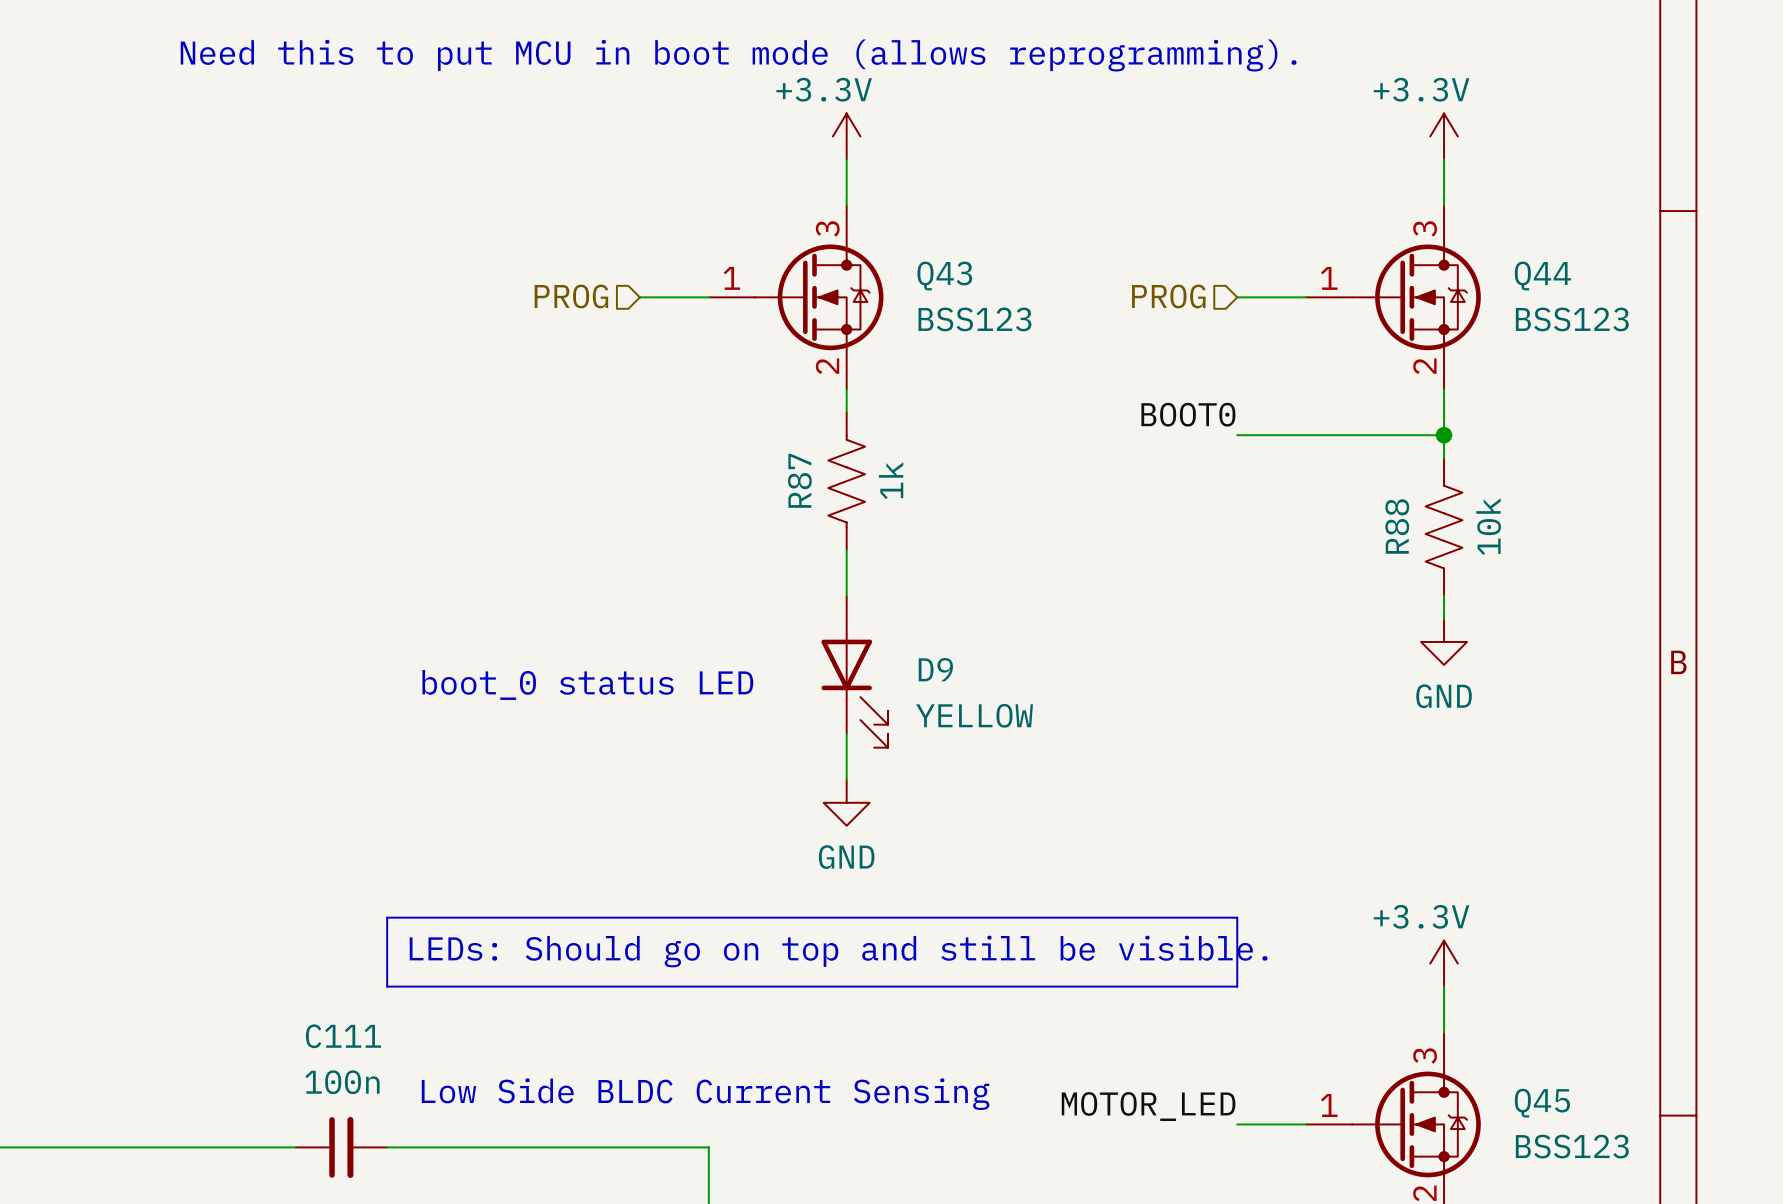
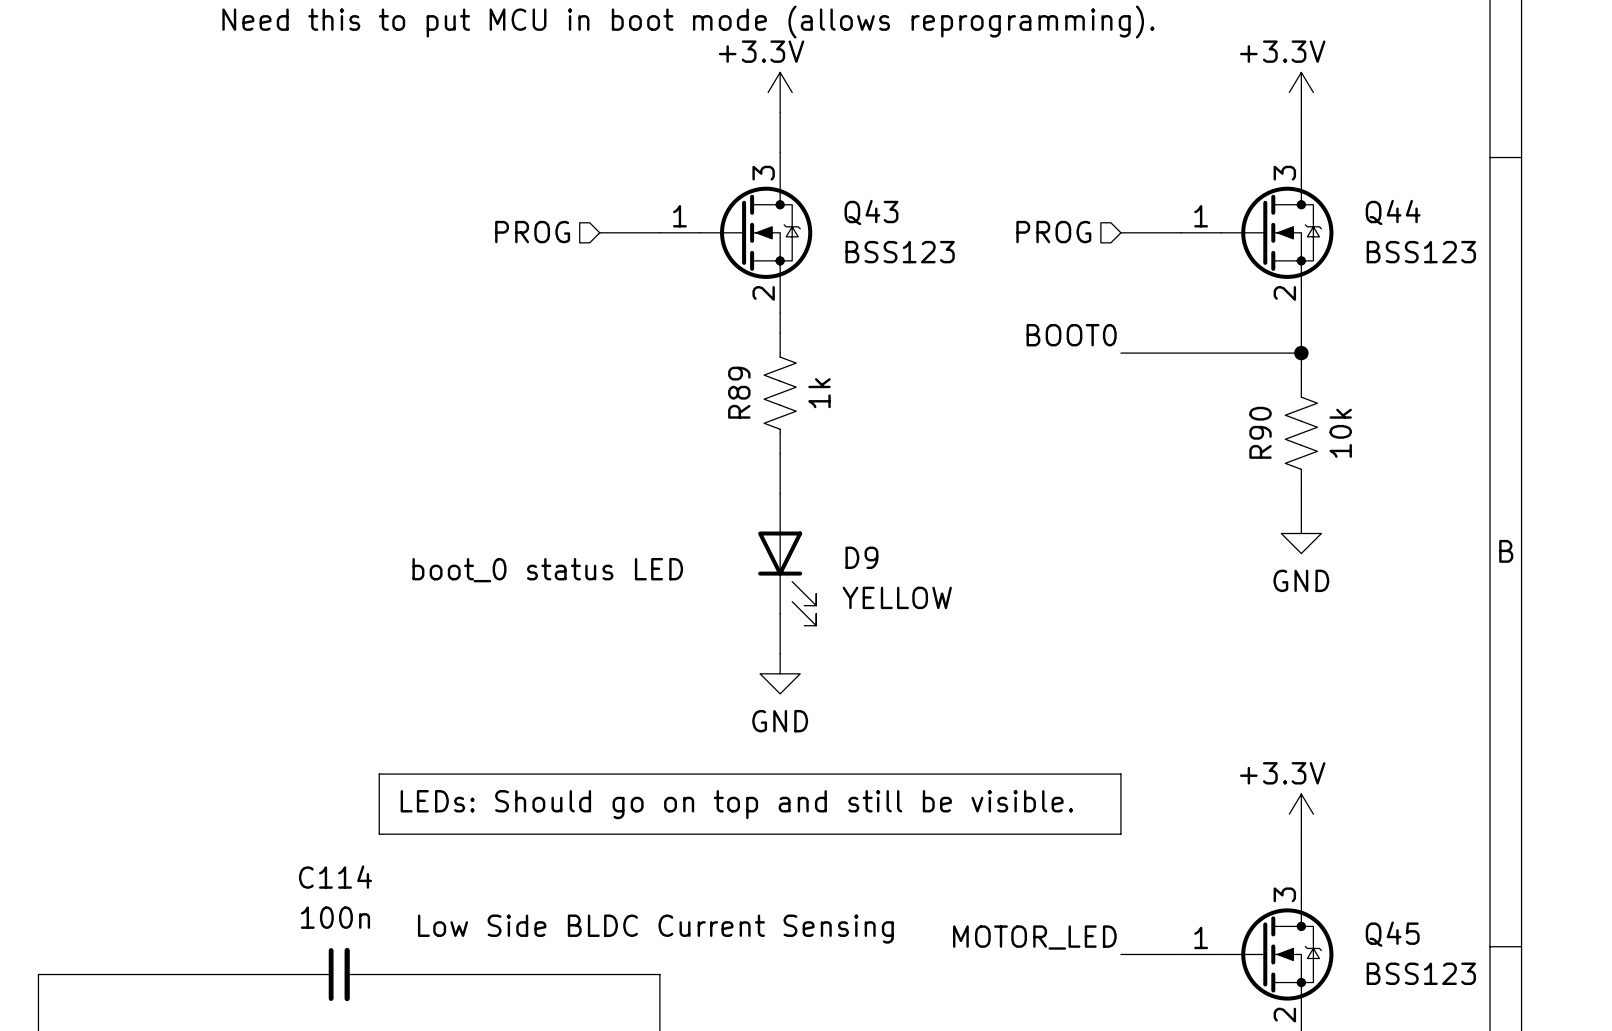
R87 name: R87 (799, 480) -> R89 (739, 392)
R88 name: R88 (1397, 526) -> R90 (1260, 432)
C111 name: C111 (343, 1036) -> C114 (335, 877)

